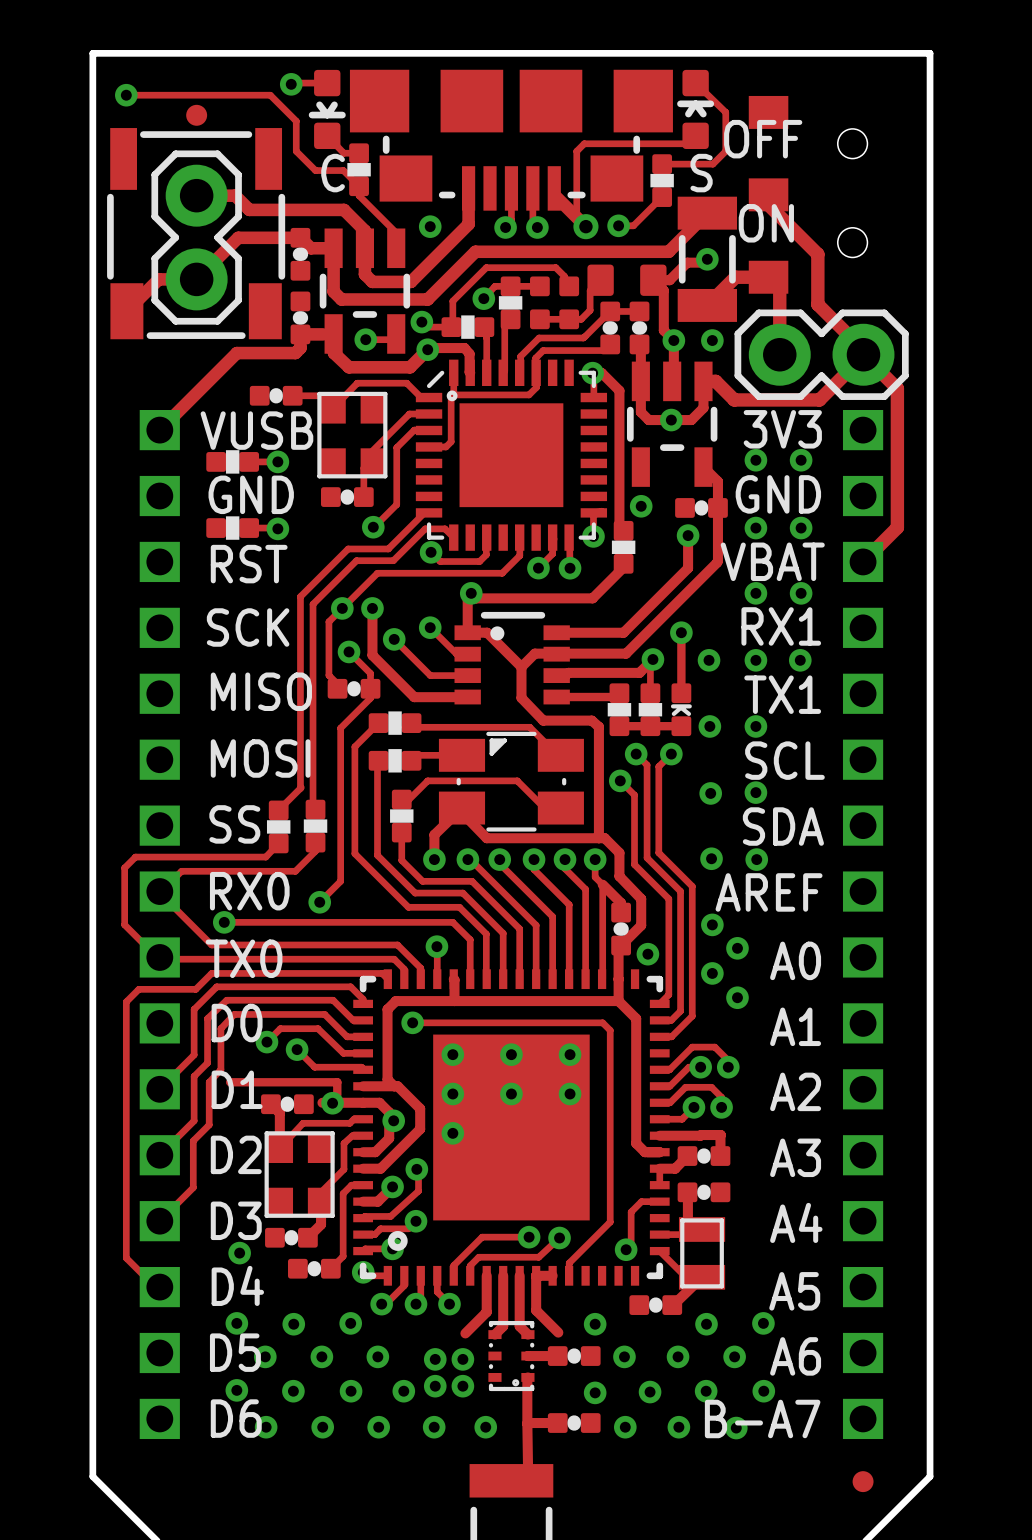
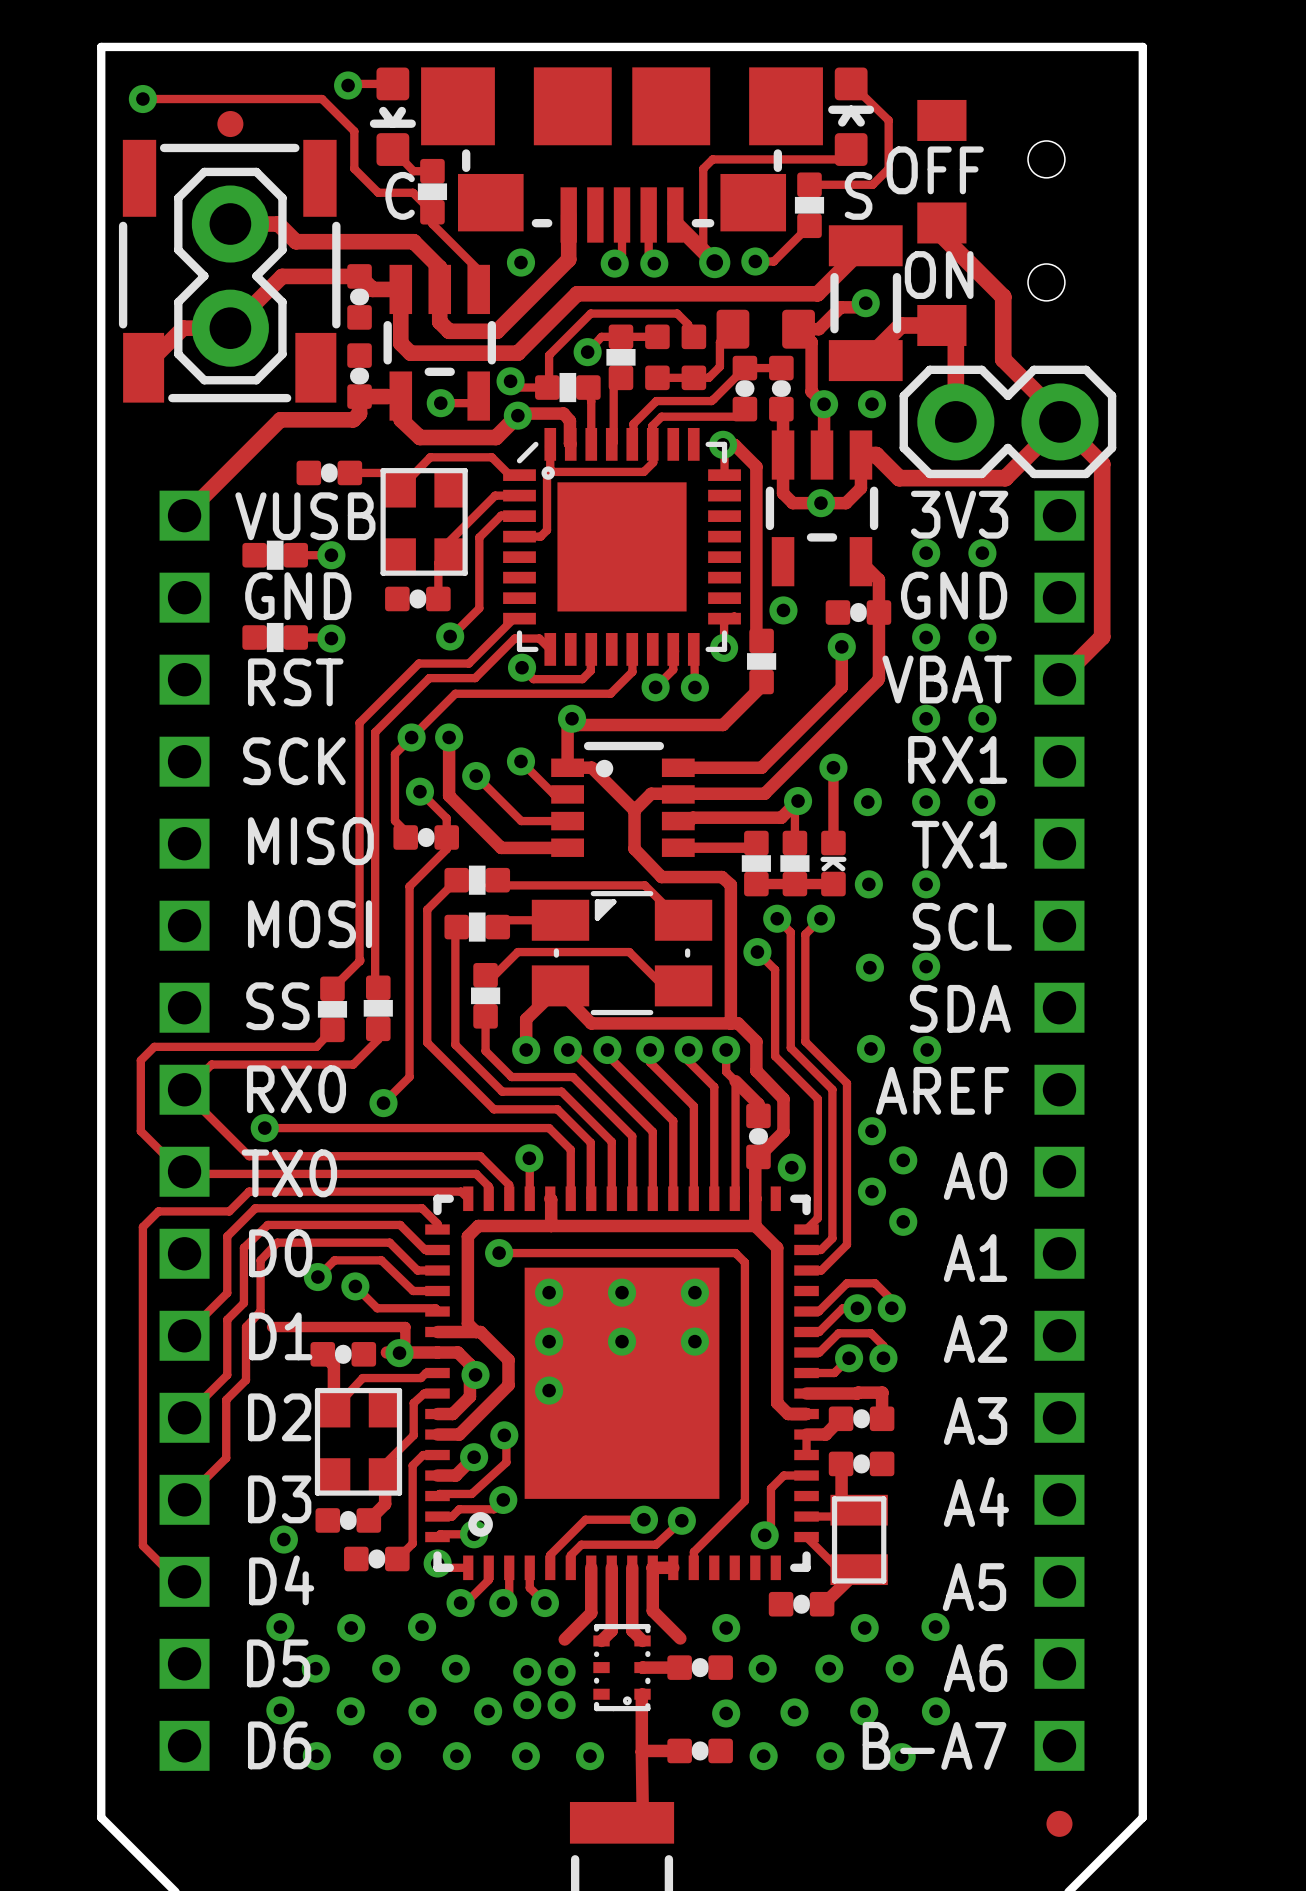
text position: OFF (763, 139) -> OFF (935, 170)
text position: ON (766, 223) -> ON (939, 275)

